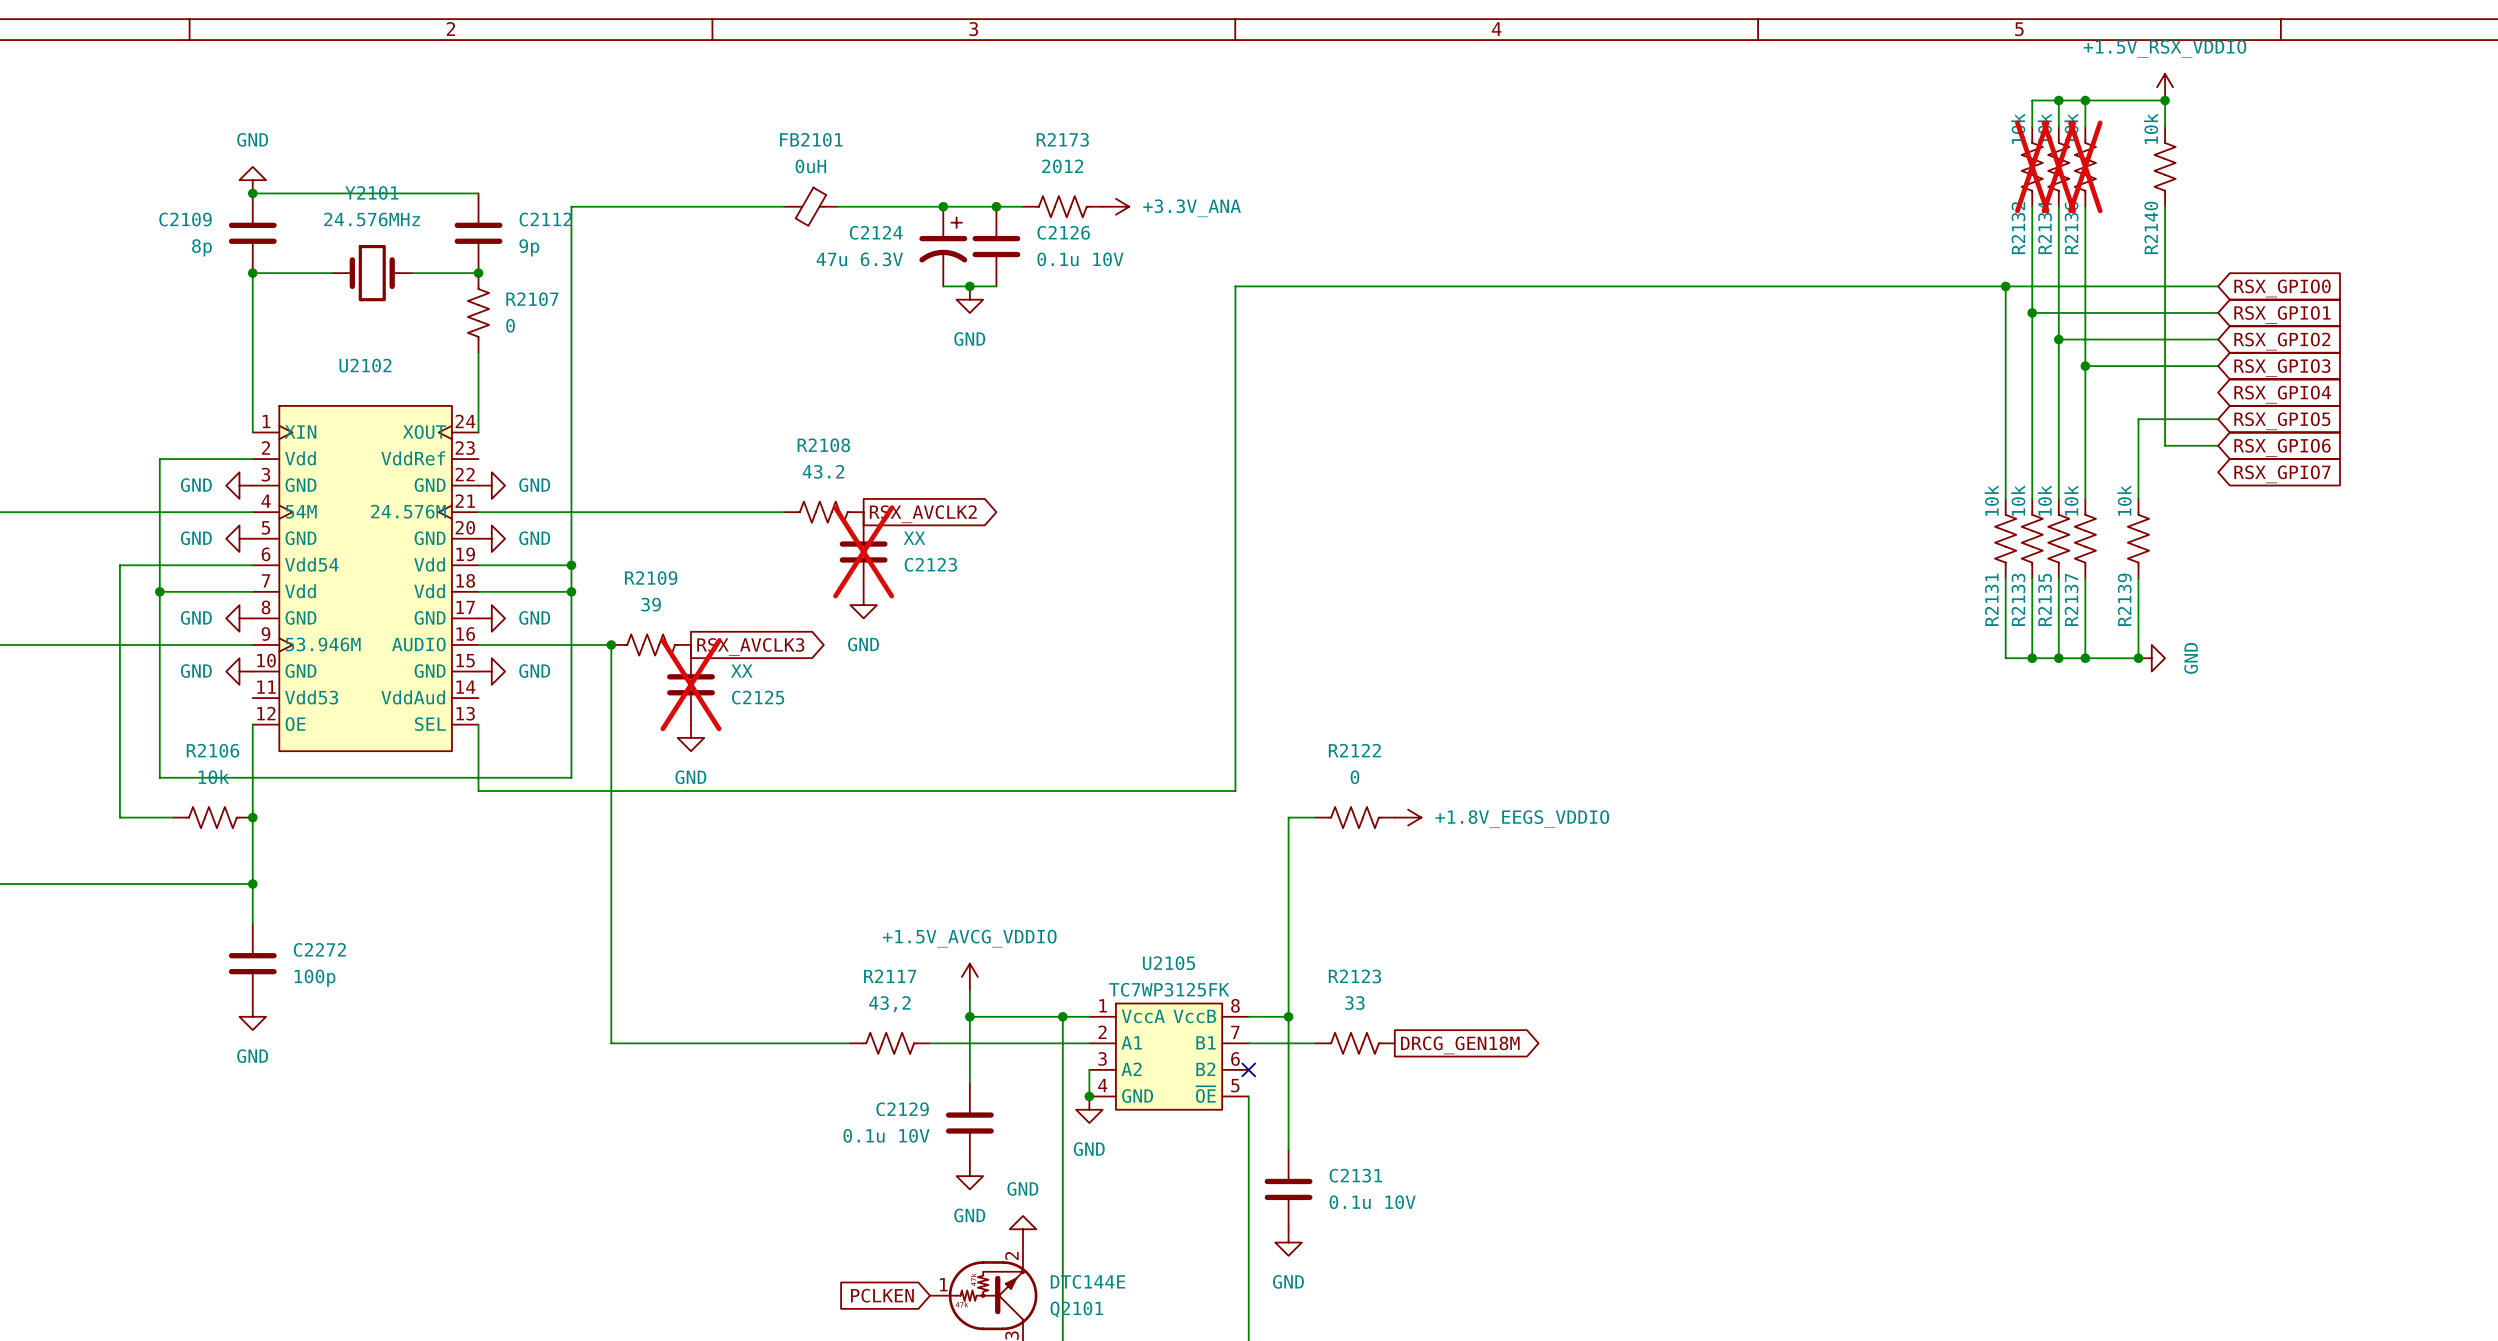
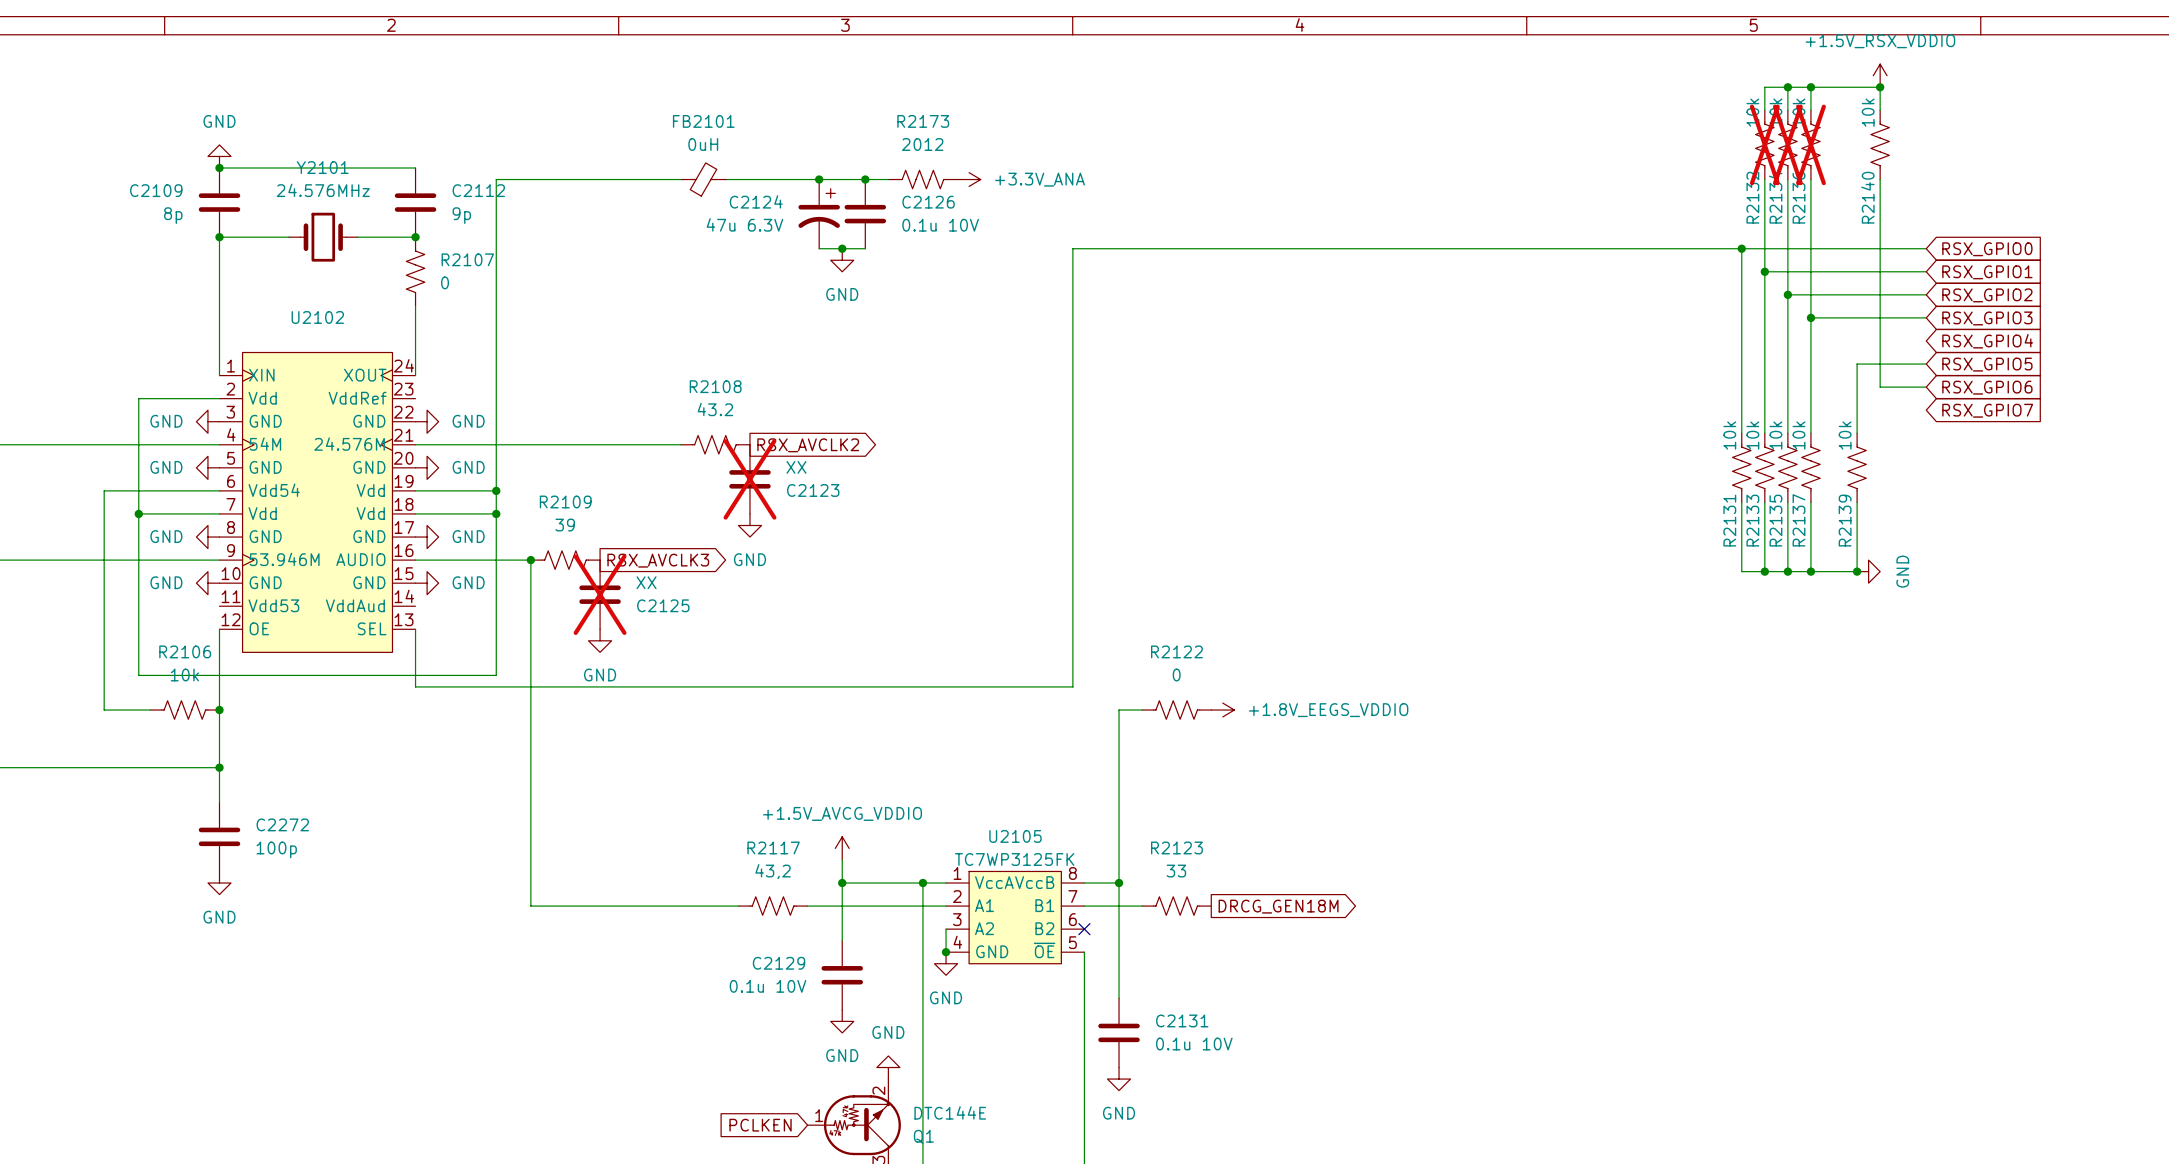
FB2101 rotation: 0° (810, 206) -> 180° (703, 179)
Q2101 name: Q2101 (1076, 1309) -> Q1 (923, 1136)

